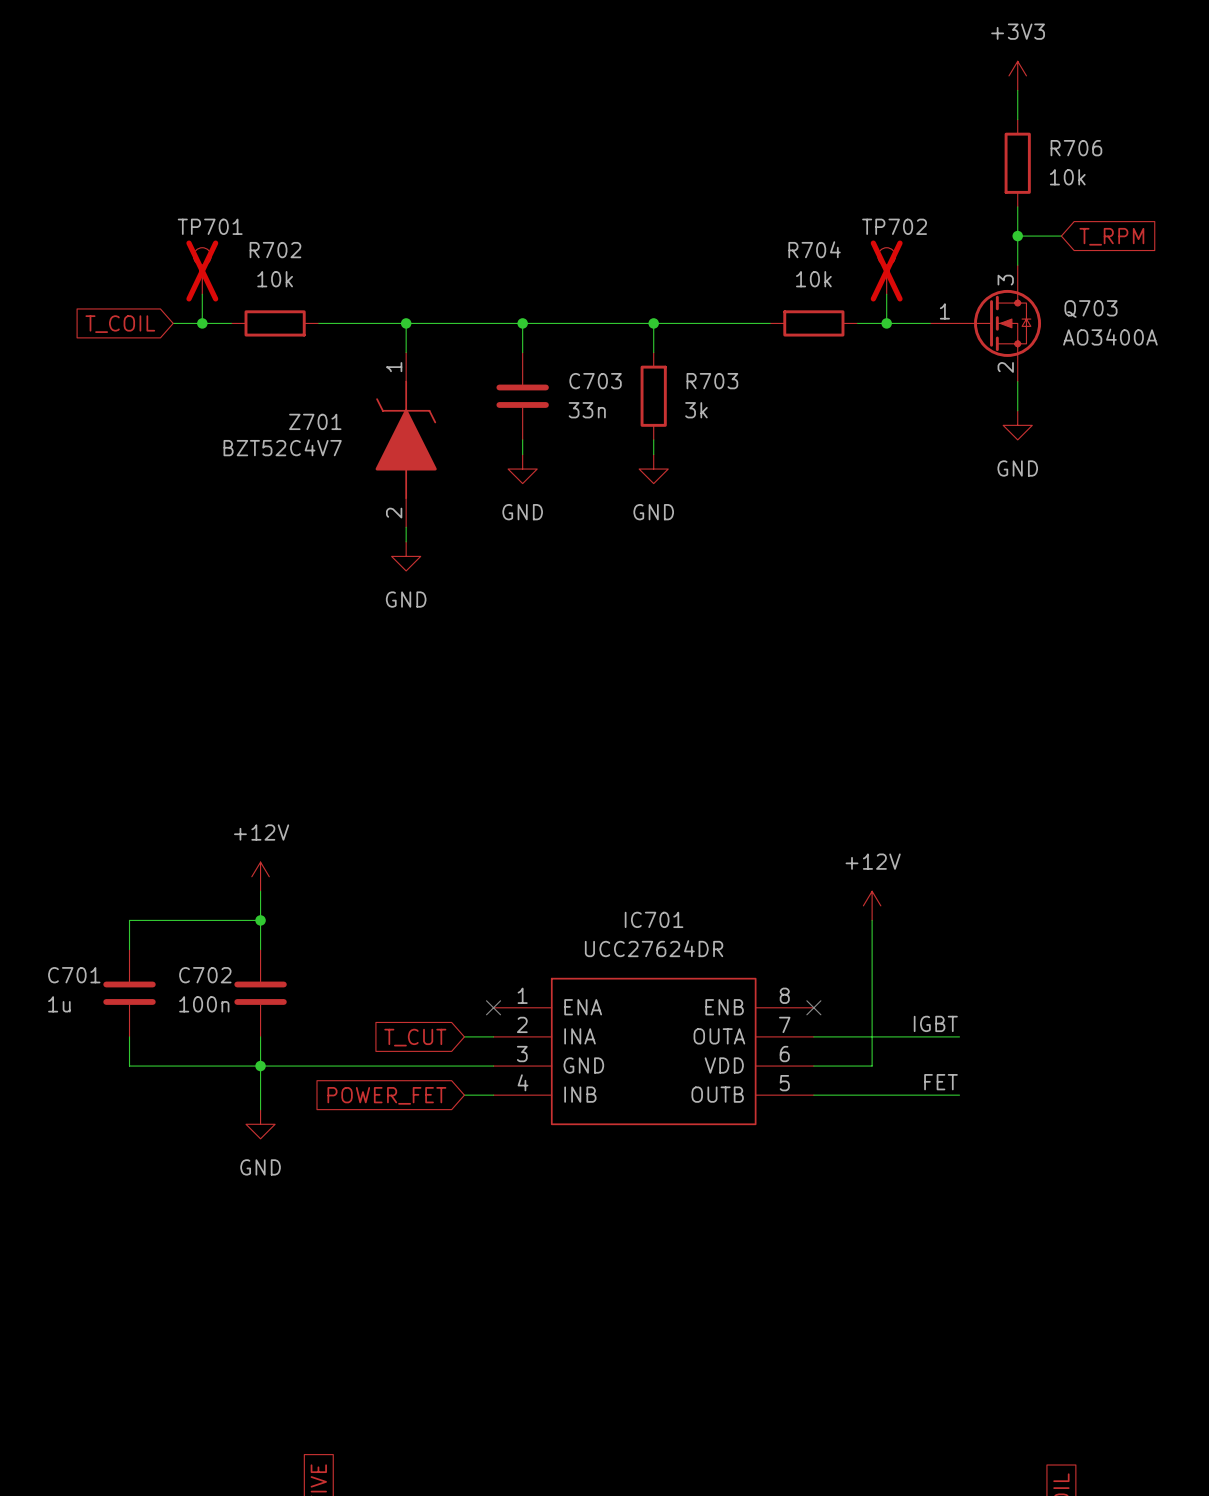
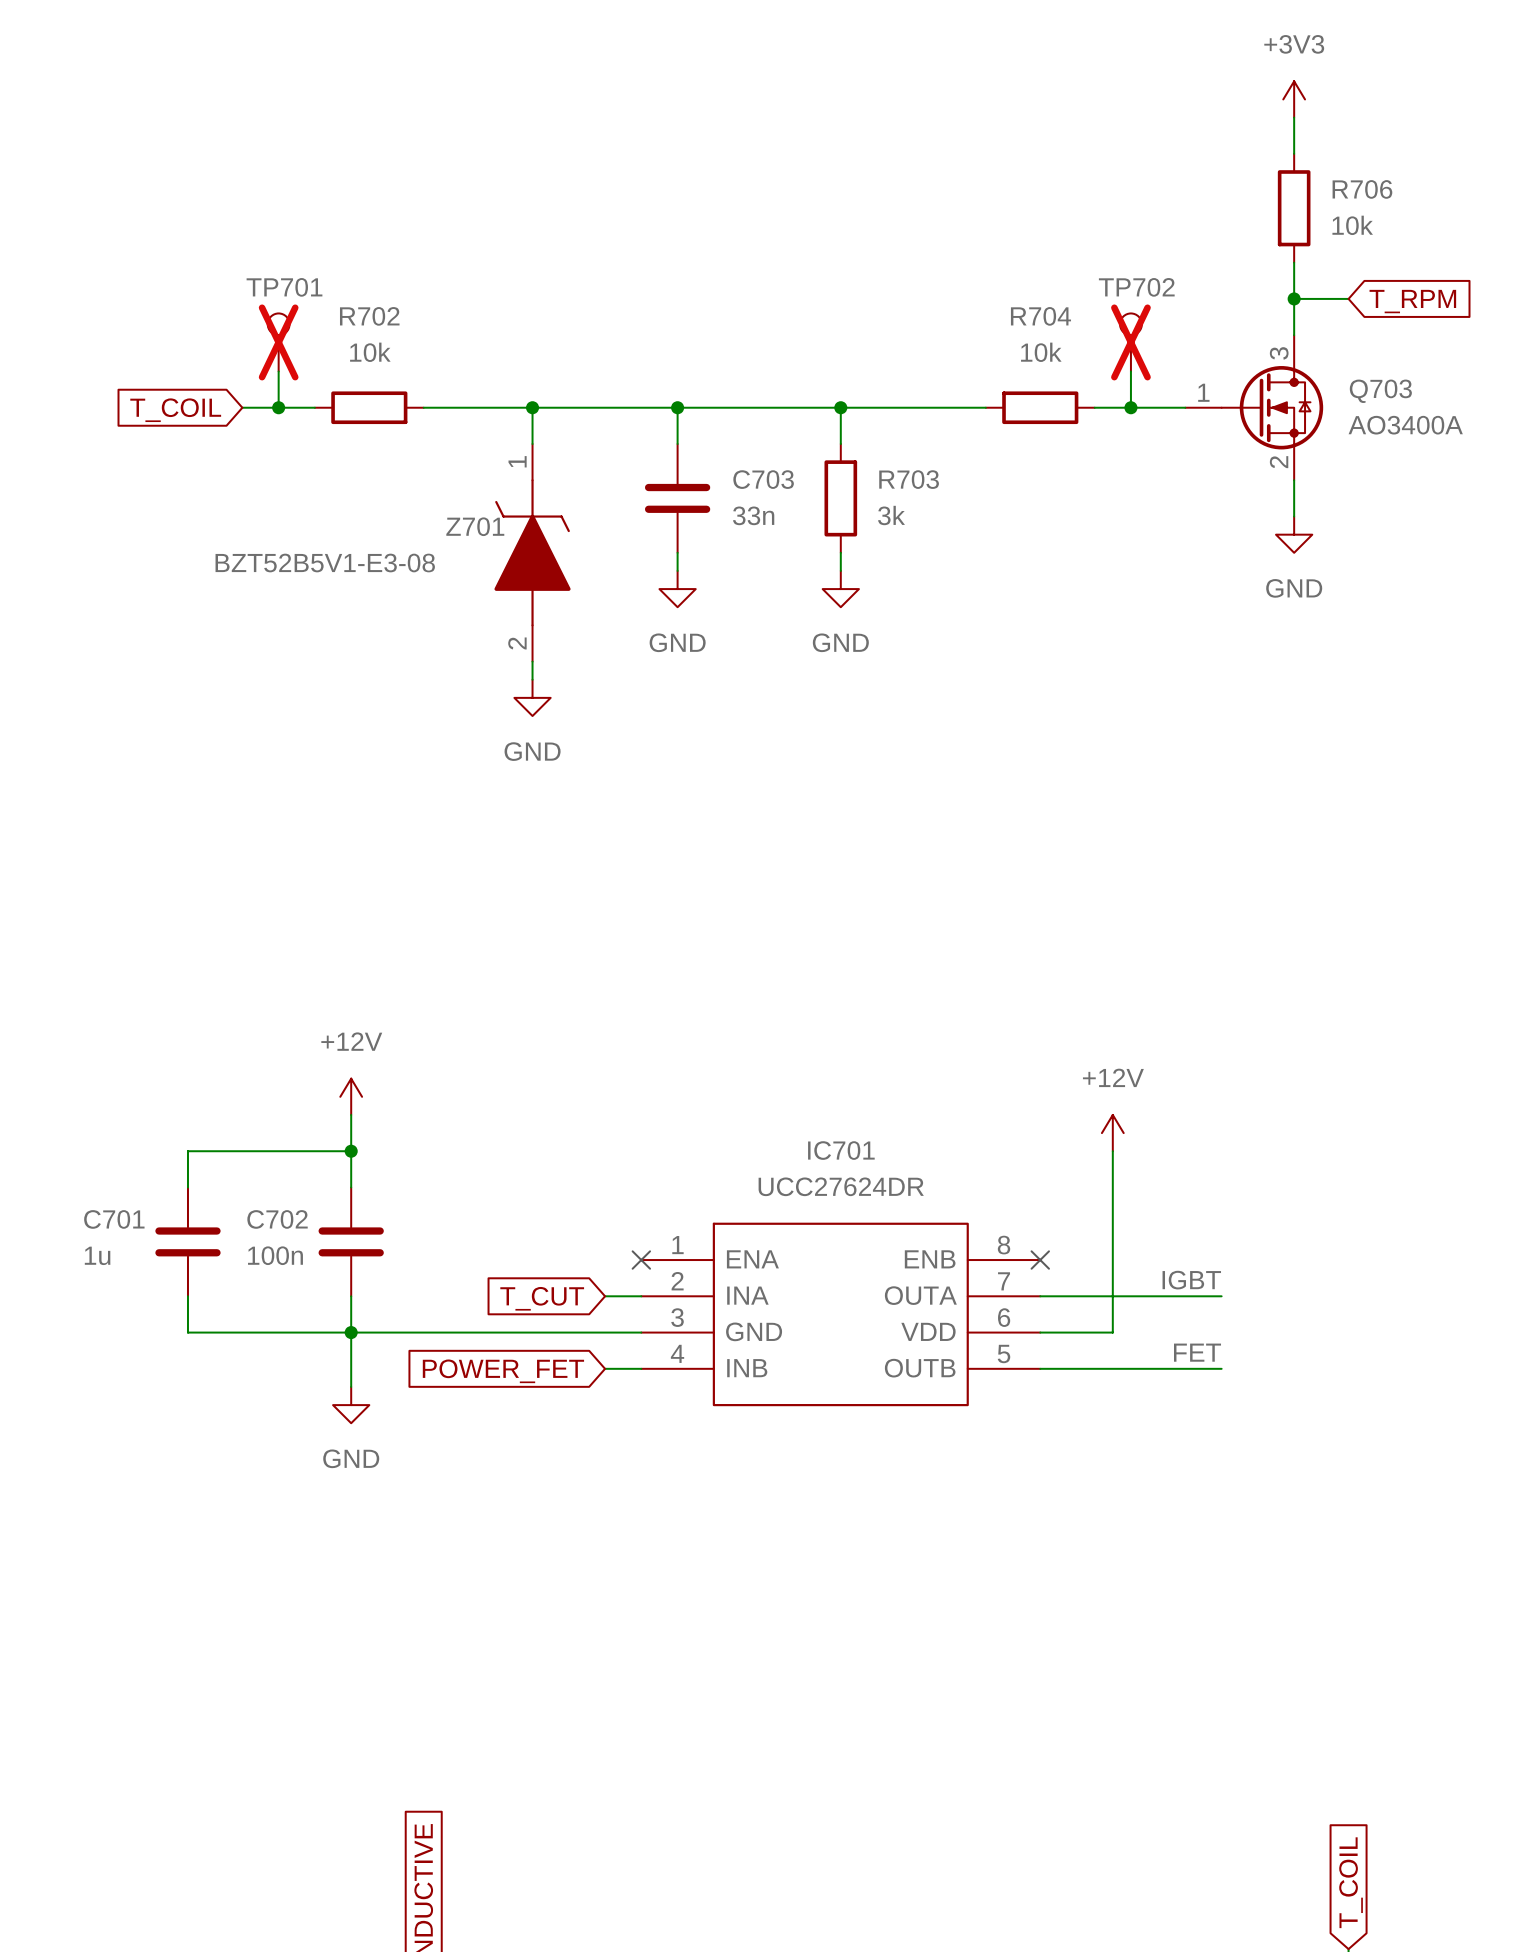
Z701 name position: Z701 (315, 421) -> Z701 (475, 526)
Z701 value: BZT52C4V7 (282, 447) -> BZT52B5V1-E3-08 (325, 563)

